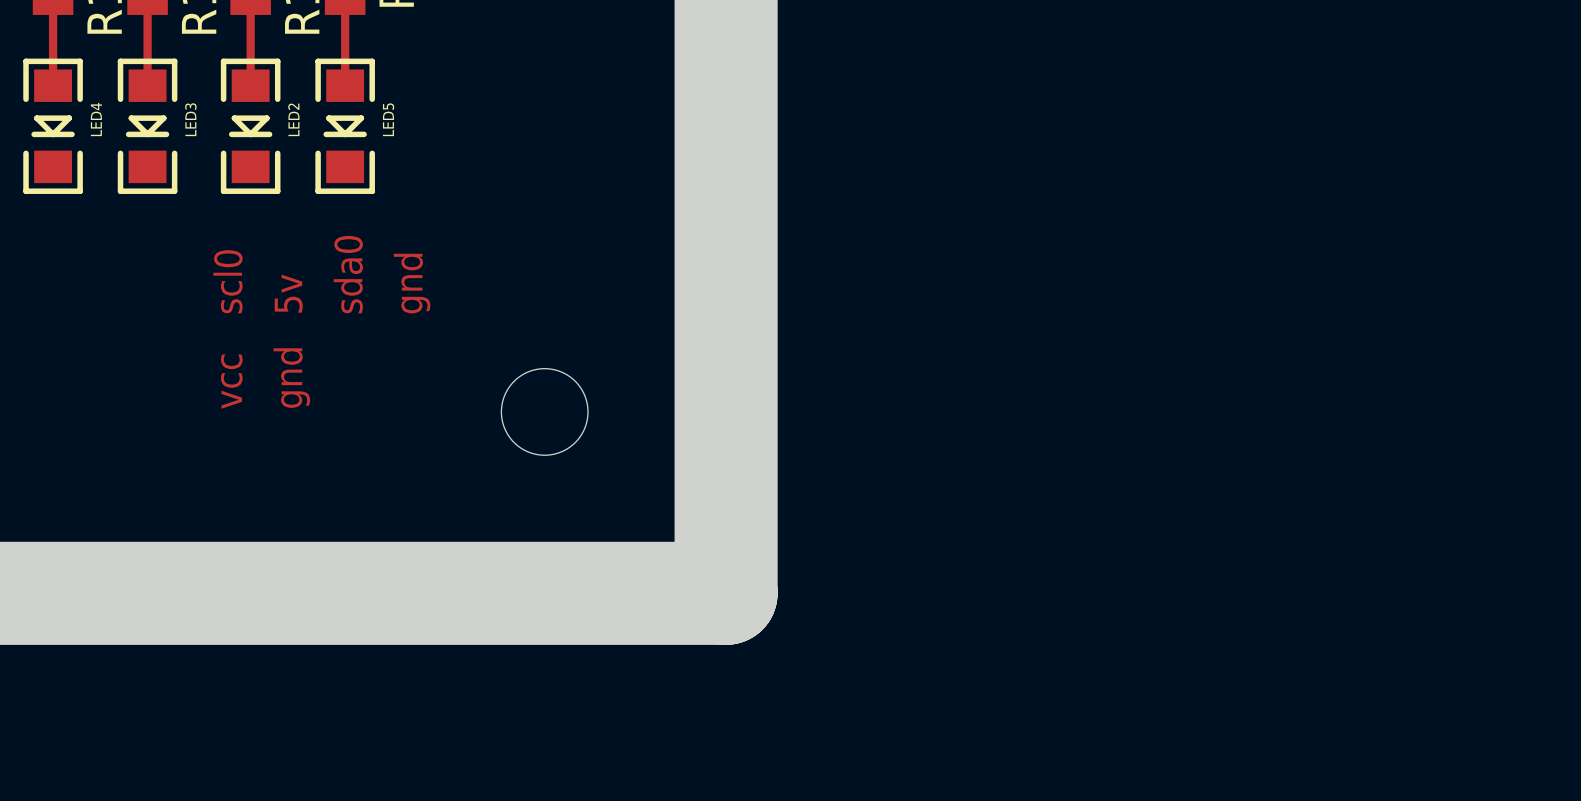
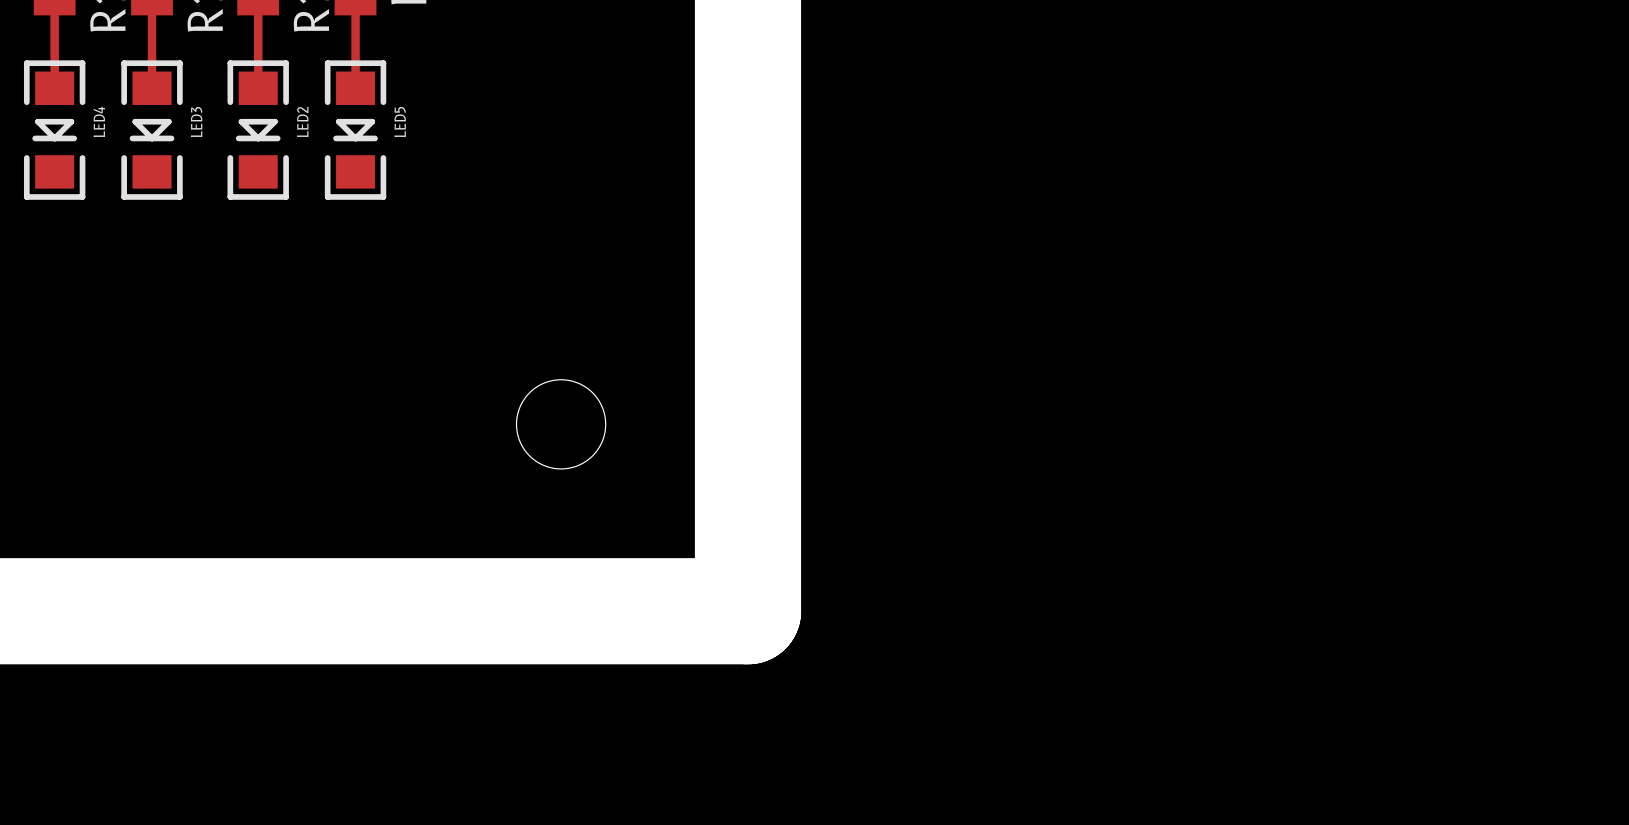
text: sda0 (348, 274) -> none
text: scl0 (228, 281) -> none
text: gnd (412, 283) -> none
text: 5v (288, 293) -> none
text: gnd (291, 378) -> none
text: vcc (231, 381) -> none

